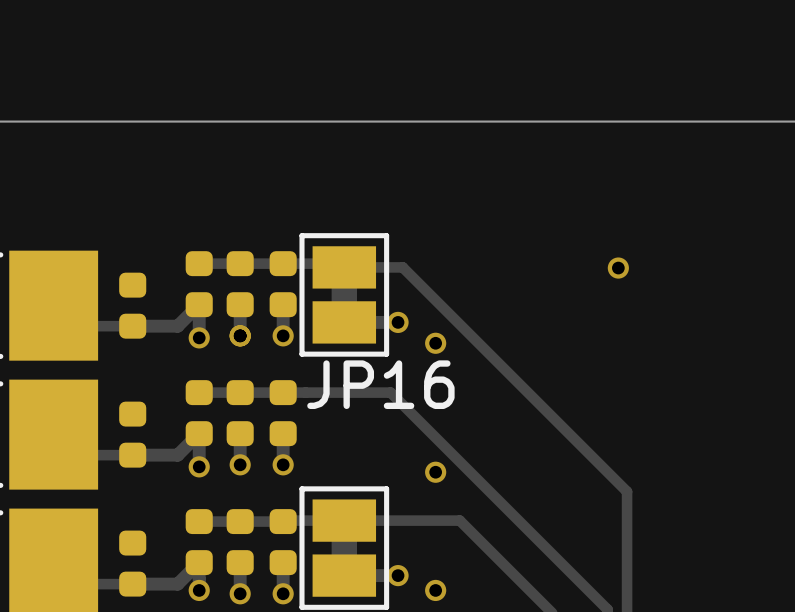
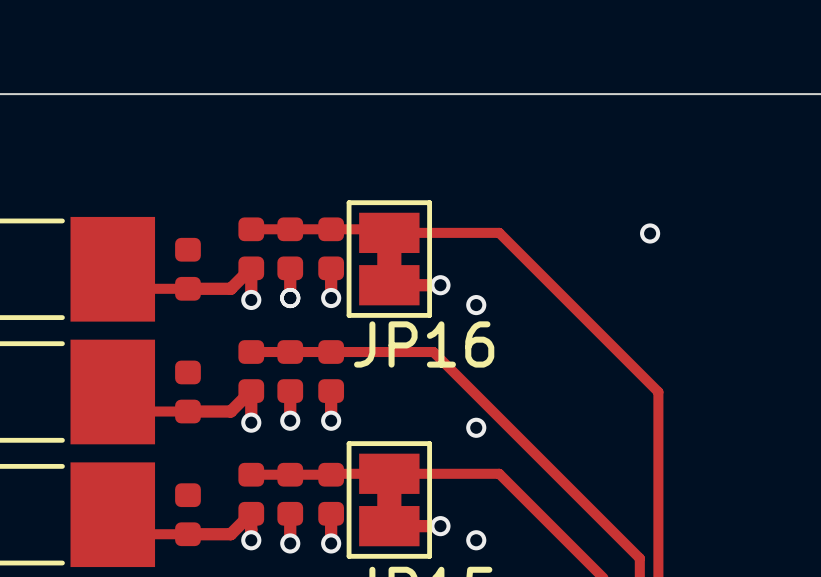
track: (402, 267) (627, 491) -> (444, 232) (499, 232) (658, 392) (658, 446)

